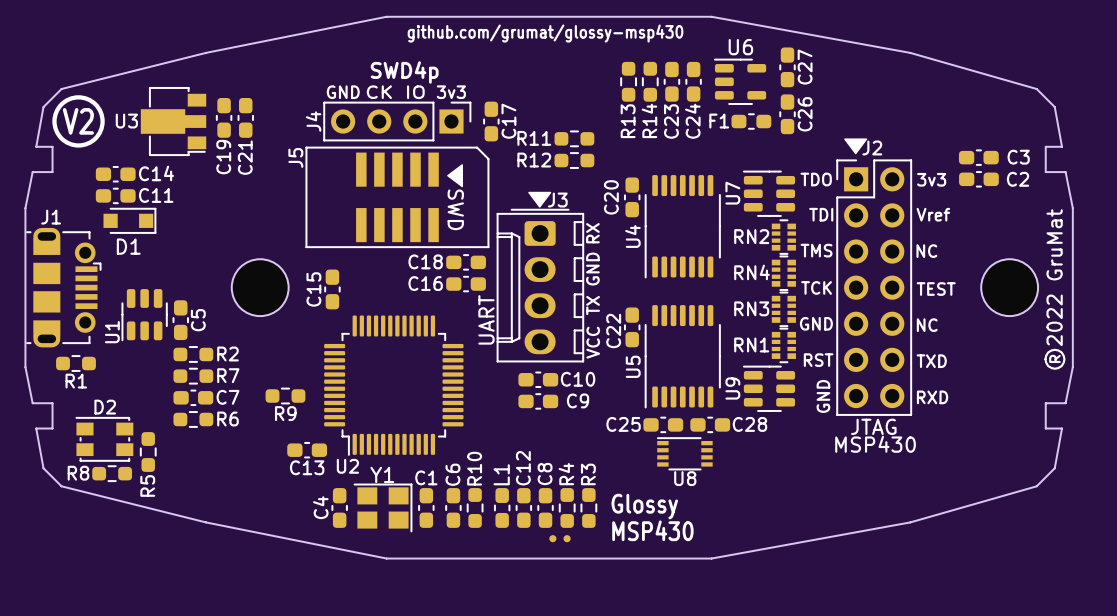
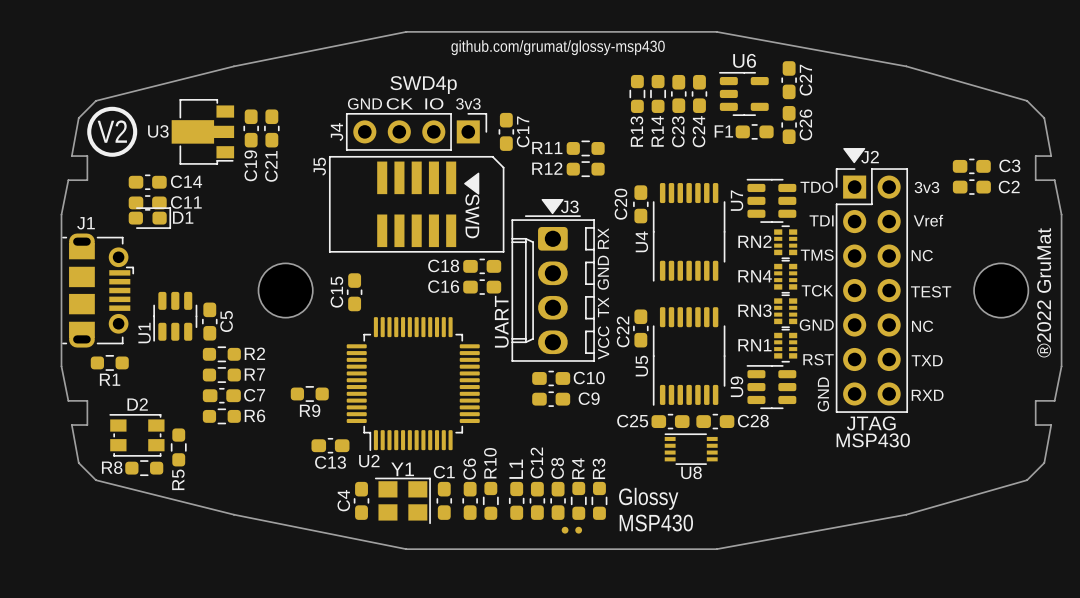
D1 footprint: [103, 207, 157, 234] -> [128, 207, 172, 229]
D1 name position: D1 (128, 246) -> D1 (183, 217)

